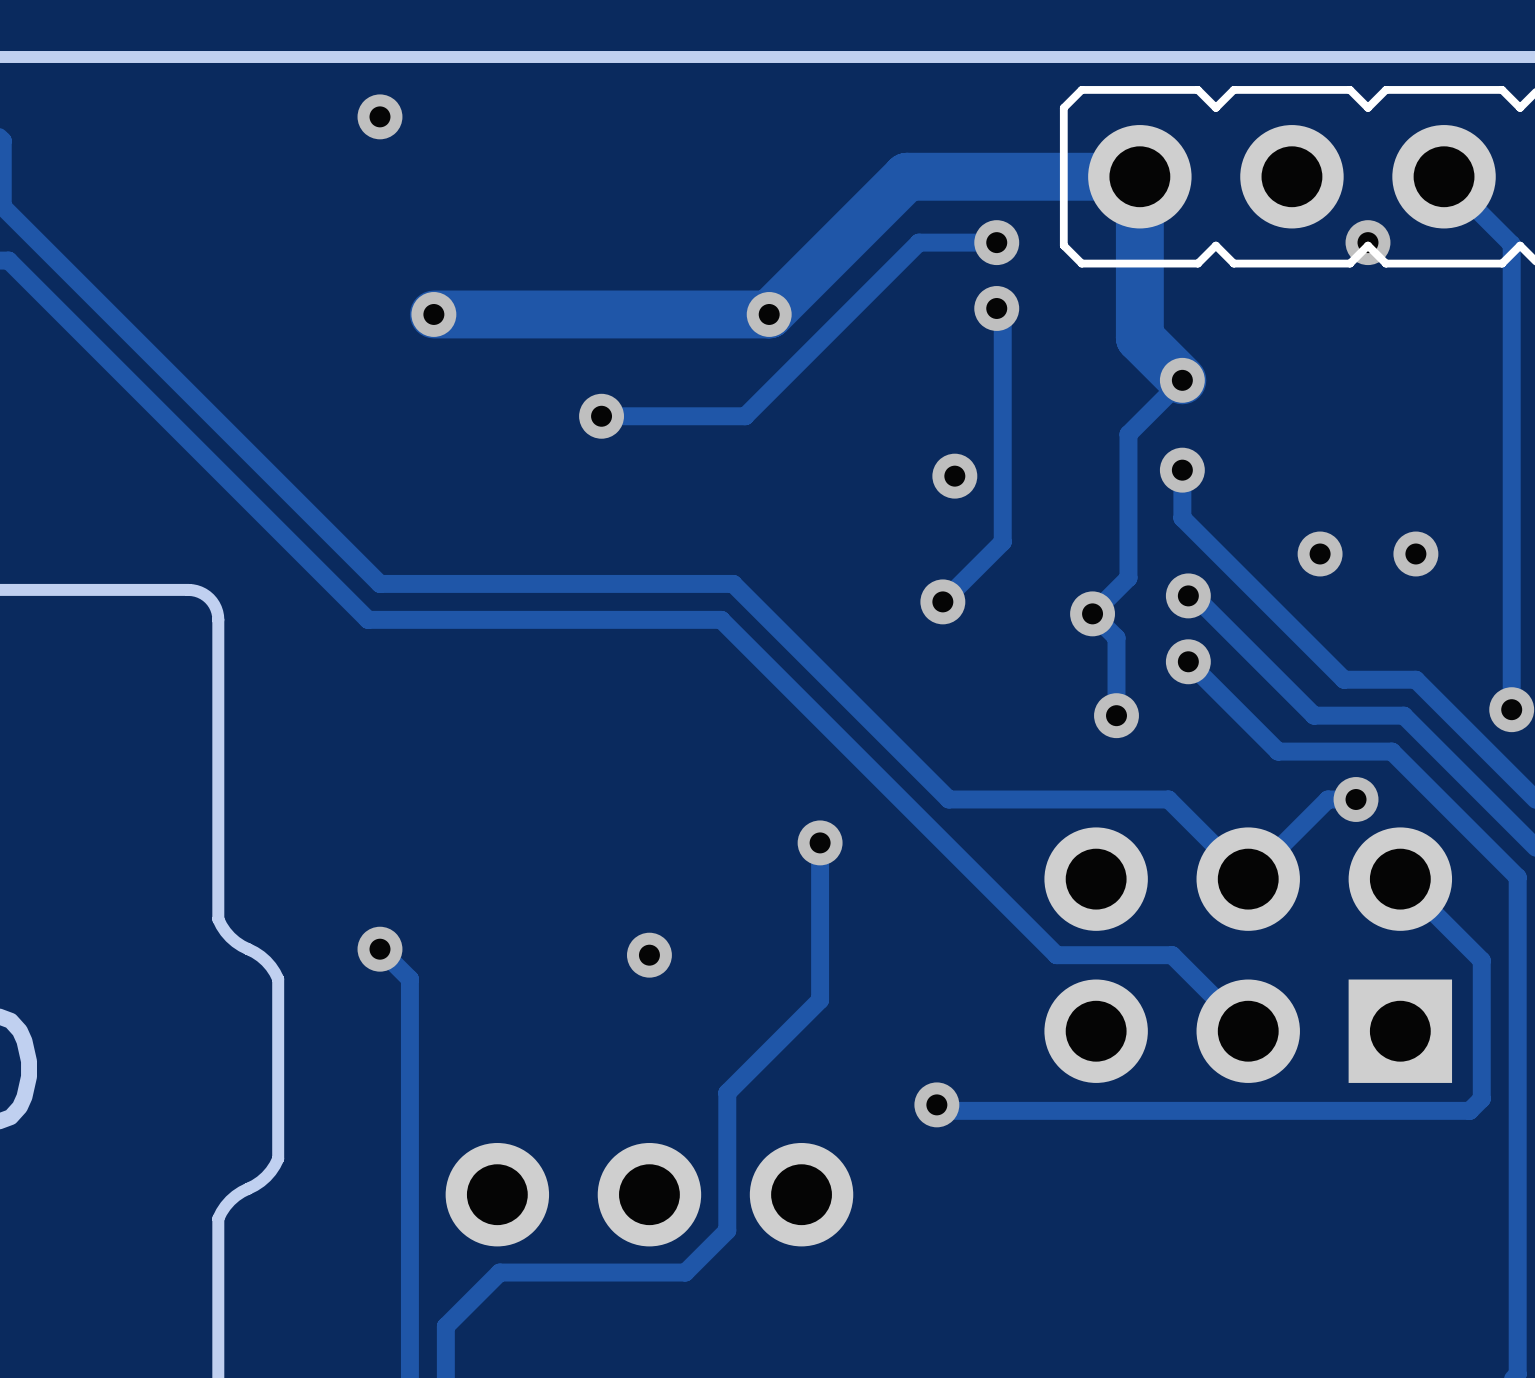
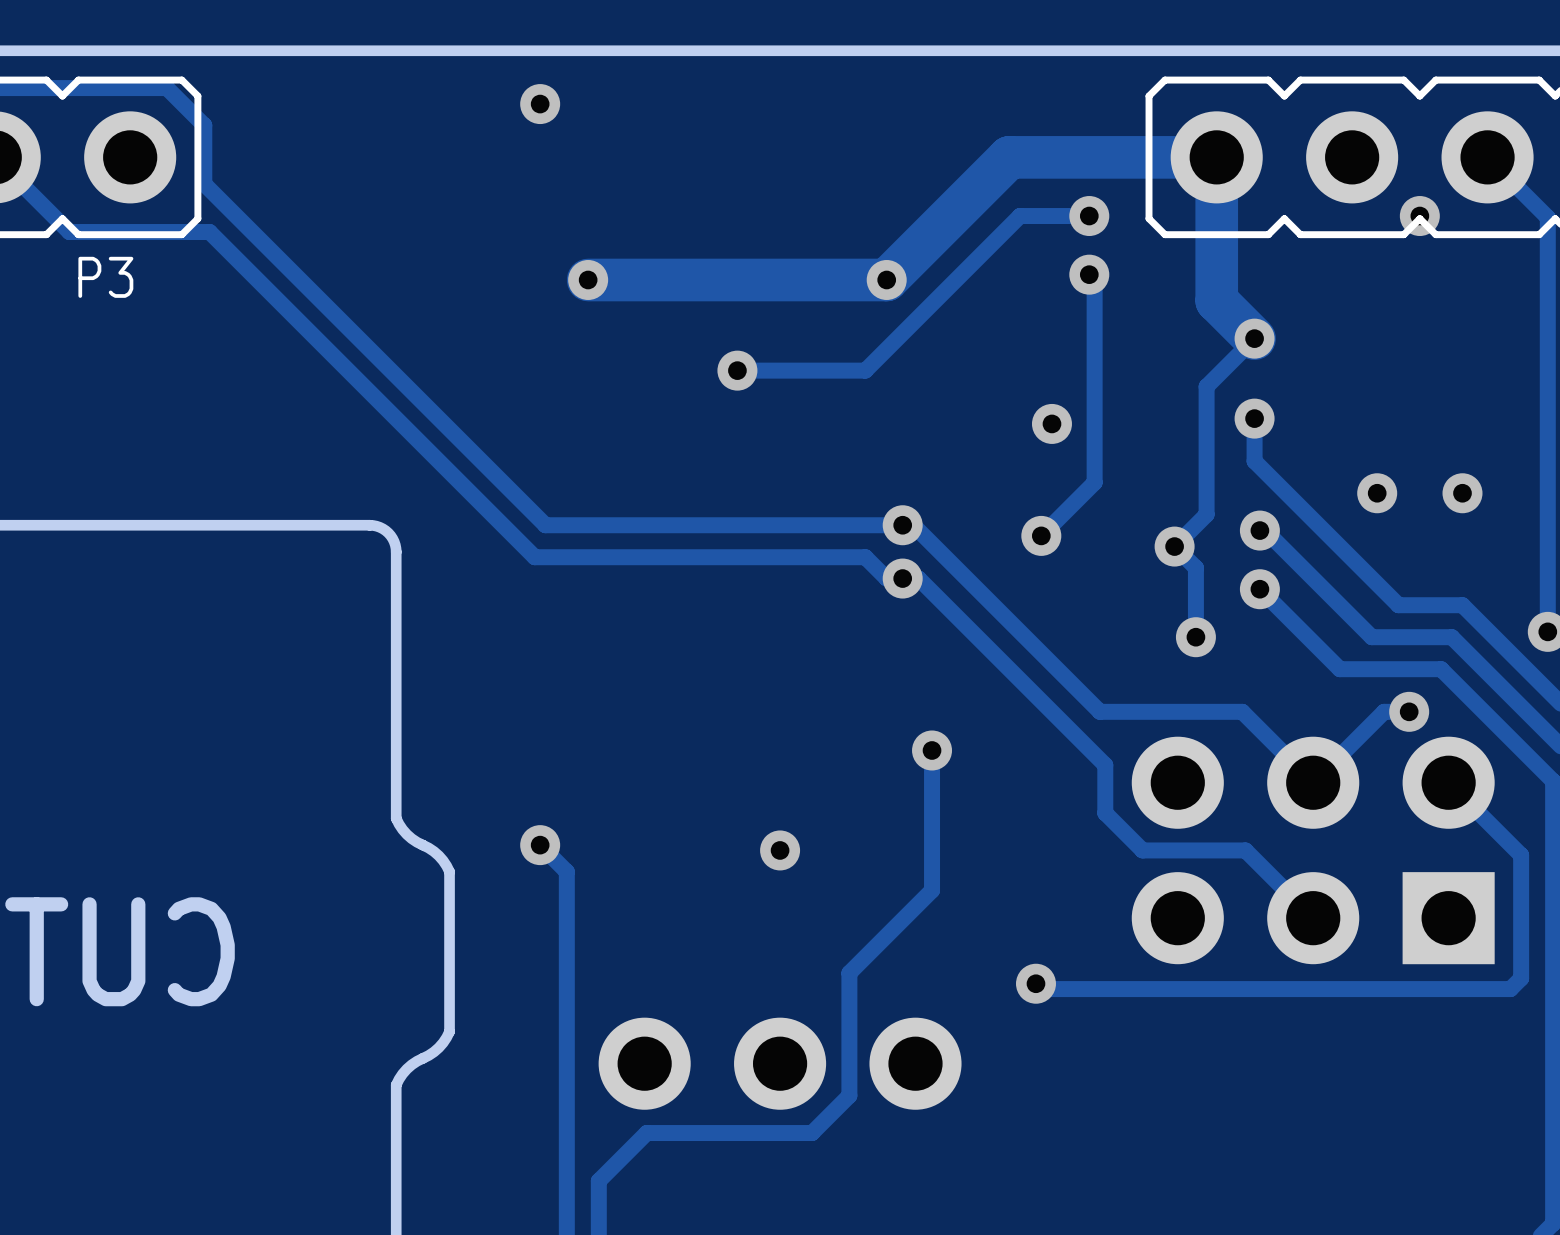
track: (379, 583) (733, 583) (948, 799) (1008, 799) -> (540, 519) (545, 525) (913, 525) (1099, 711)
via: none -> (902, 525)
track: (368, 619) (721, 619) (1014, 913) -> (529, 551) (534, 557) (865, 557) (886, 578) (918, 578) (1105, 765) (1105, 813)
via: none -> (902, 578)

